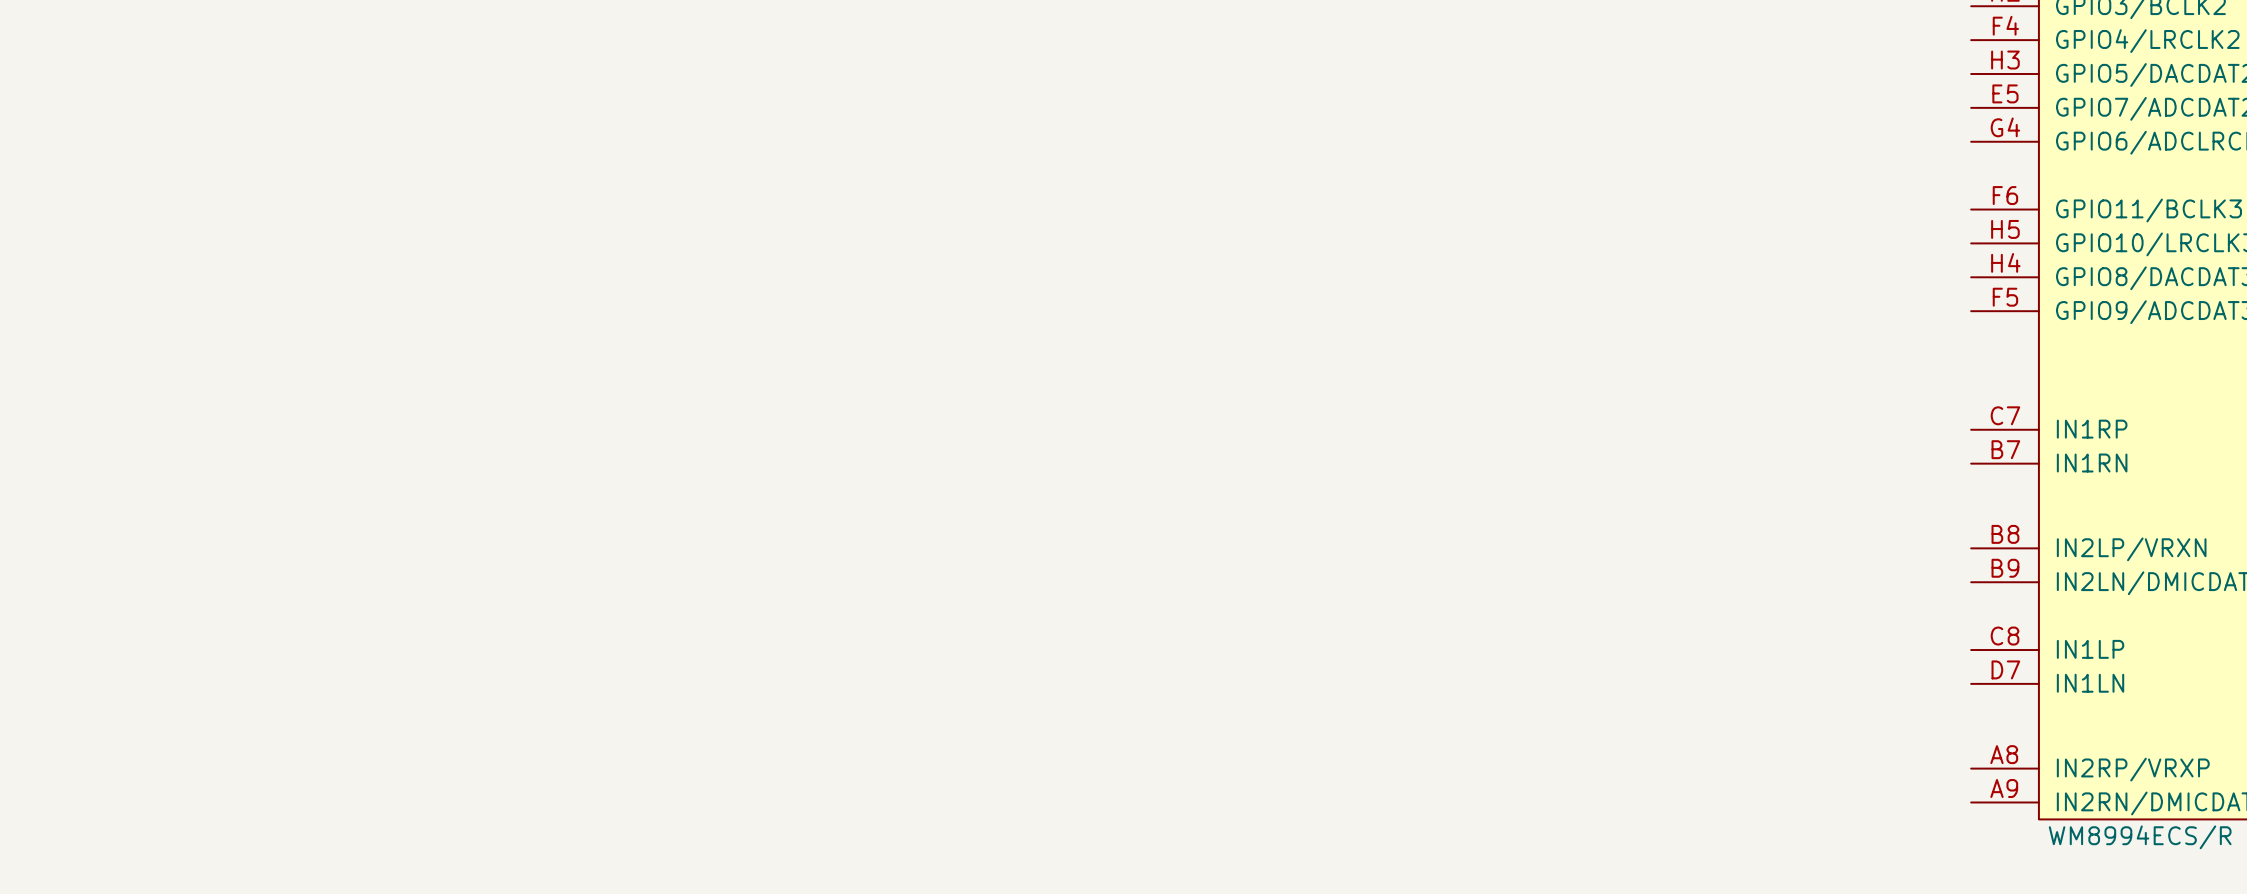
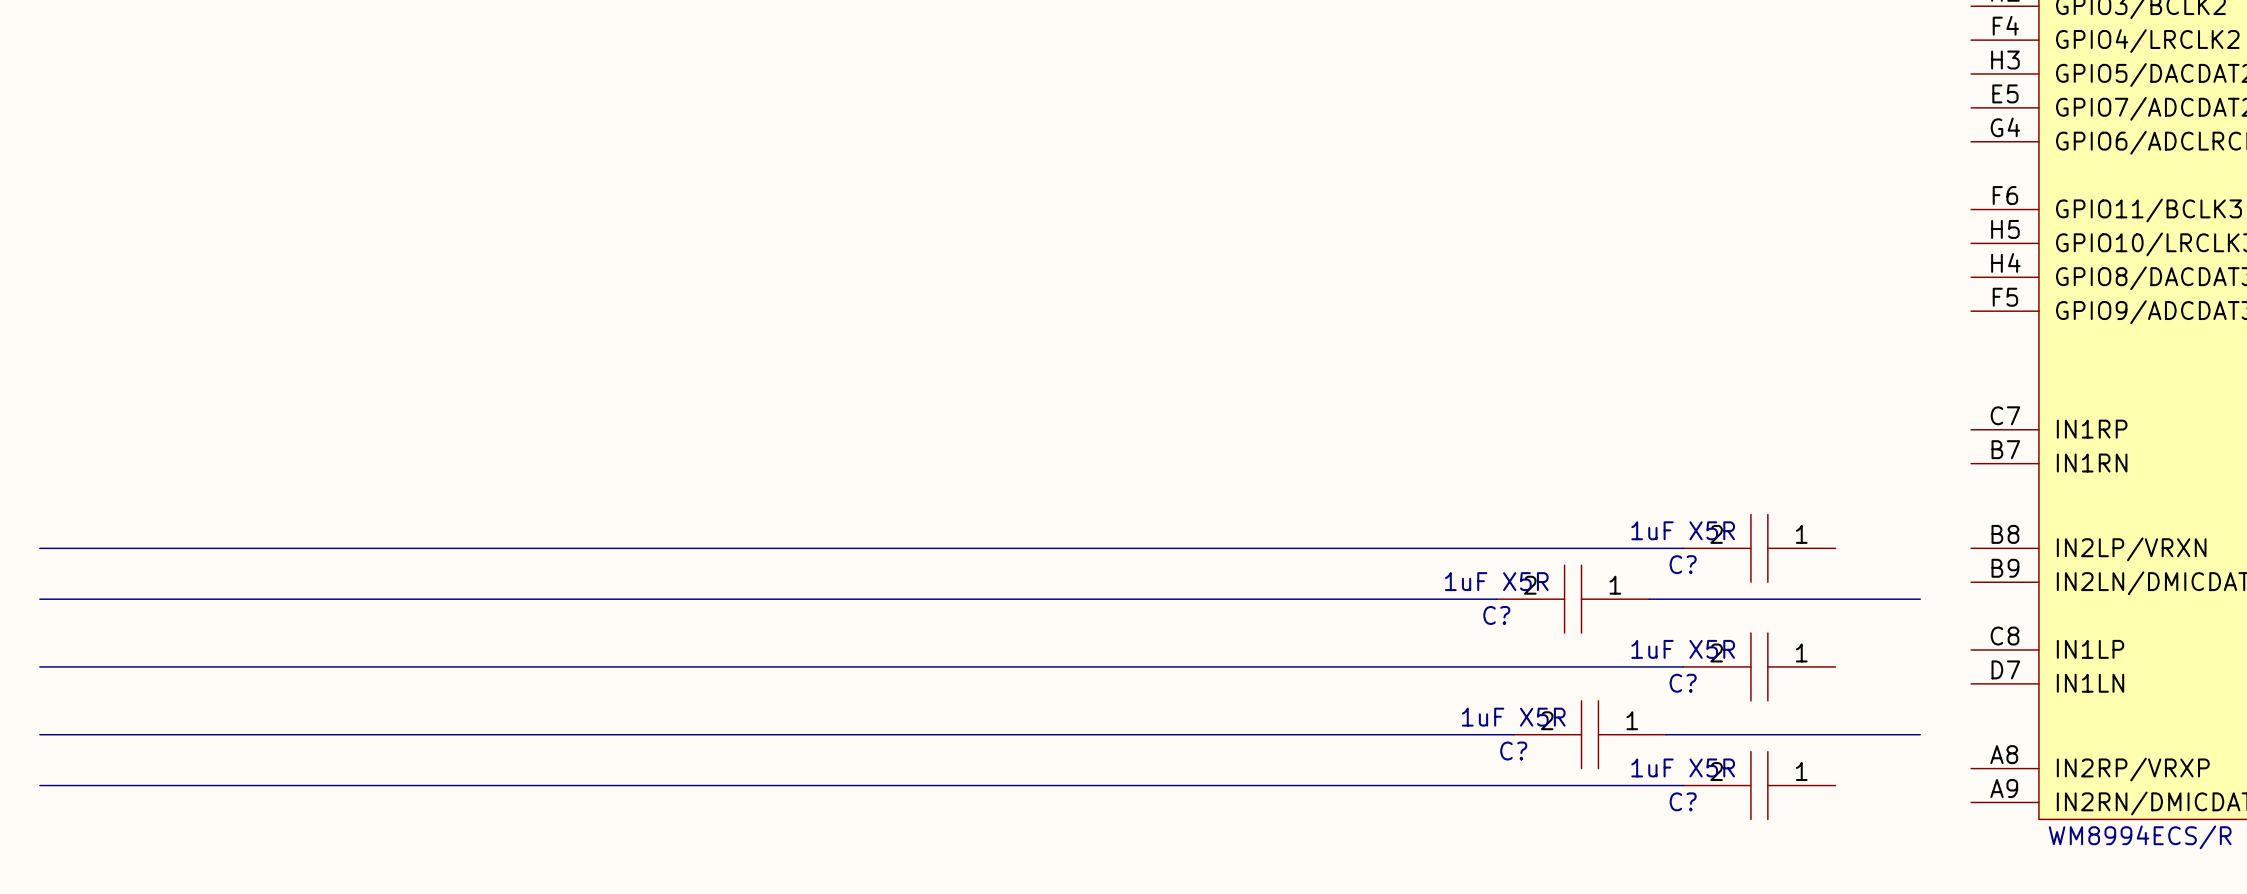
wire: none -> (39, 548) (1683, 548)
C?: none -> (1759, 548)
wire: none -> (39, 599) (1496, 599)
C?: none -> (1573, 599)
wire: none -> (1649, 599) (1920, 599)
wire: none -> (39, 666) (1683, 666)
C?: none -> (1759, 666)
wire: none -> (39, 734) (1513, 734)
C?: none -> (1589, 734)
wire: none -> (1666, 734) (1920, 734)
wire: none -> (39, 785) (1683, 785)
C?: none -> (1759, 785)

